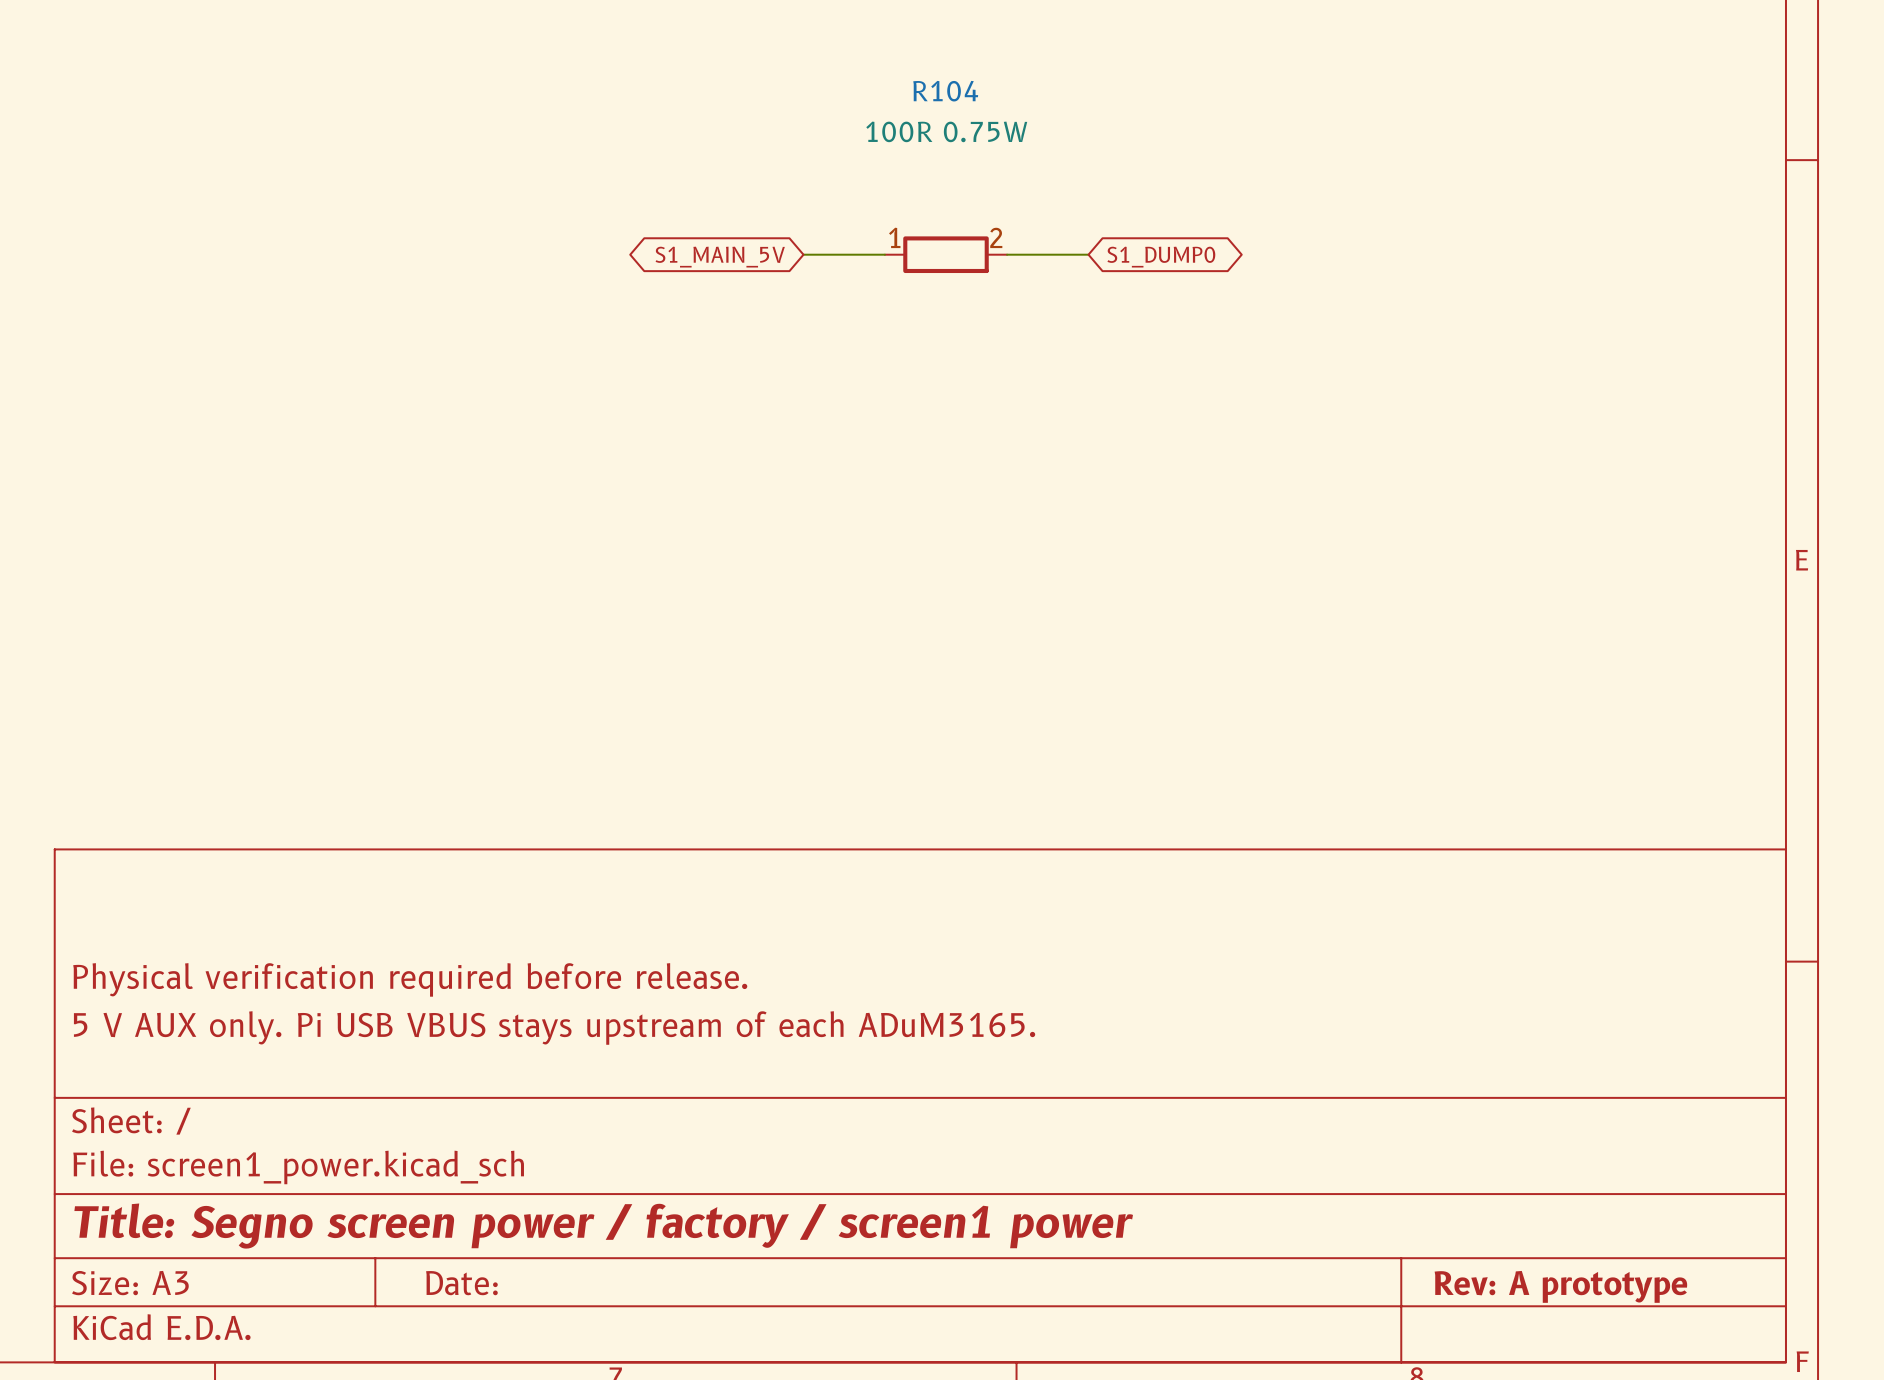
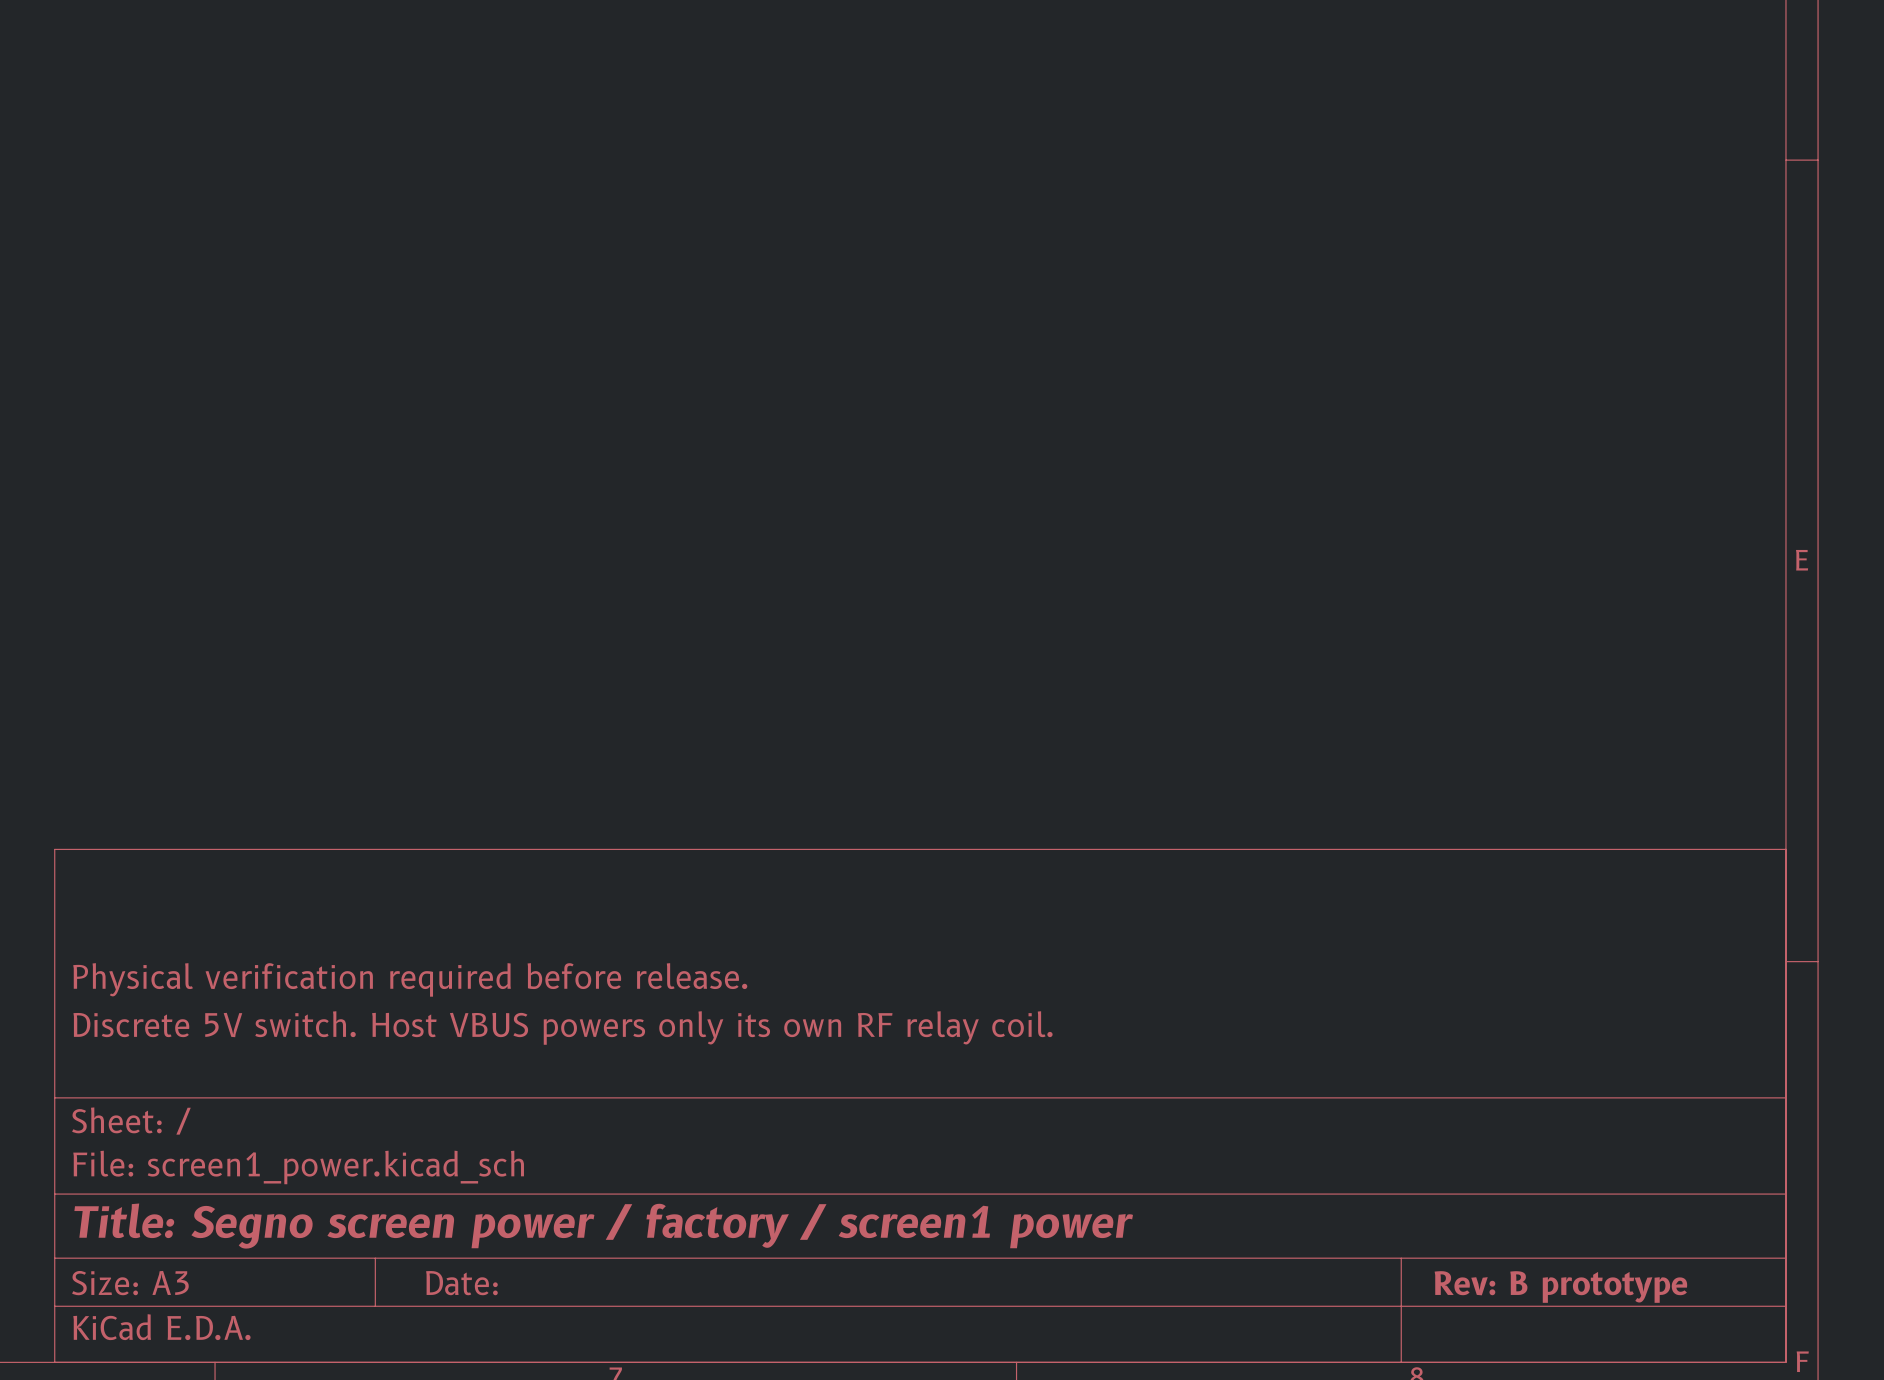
wire: (803, 254) (884, 254) -> none
R104: 100R 0.75W (946, 254) -> none
wire: (1007, 254) (1088, 254) -> none
global label: S1_MAIN_5V (720, 257) -> none
global label: S1_DUMP0 (1161, 257) -> none
title block: 5 V AUX only. Pi USB VBUS stays upstream of each ADuM3165. (554, 1028) -> Discrete 5V switch. Host VBUS powers only its own RF relay coil. (563, 1028)
title block: Rev: A prototype (1560, 1286) -> Rev: B prototype (1560, 1286)

